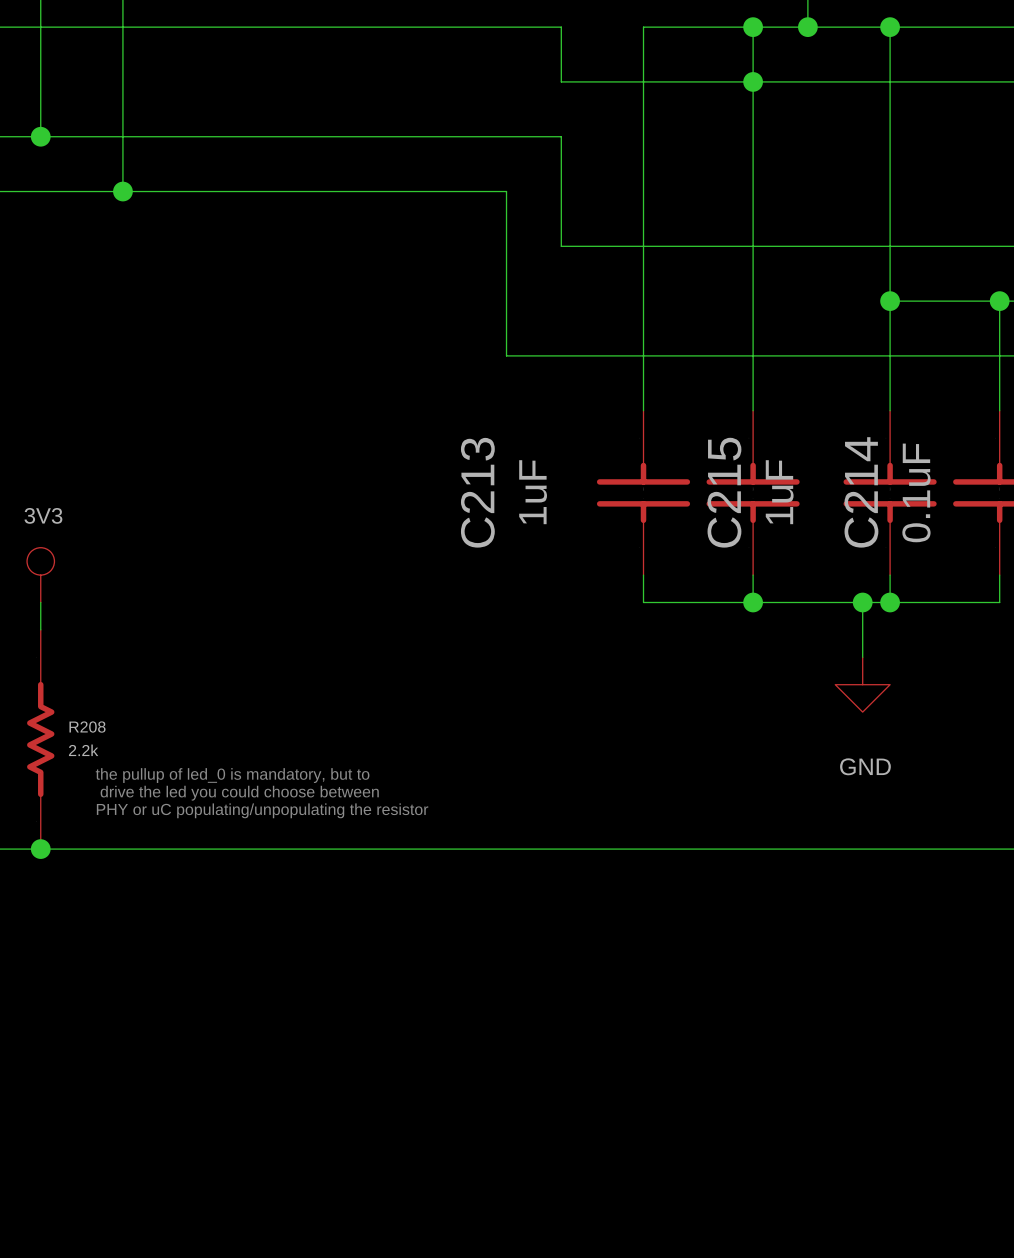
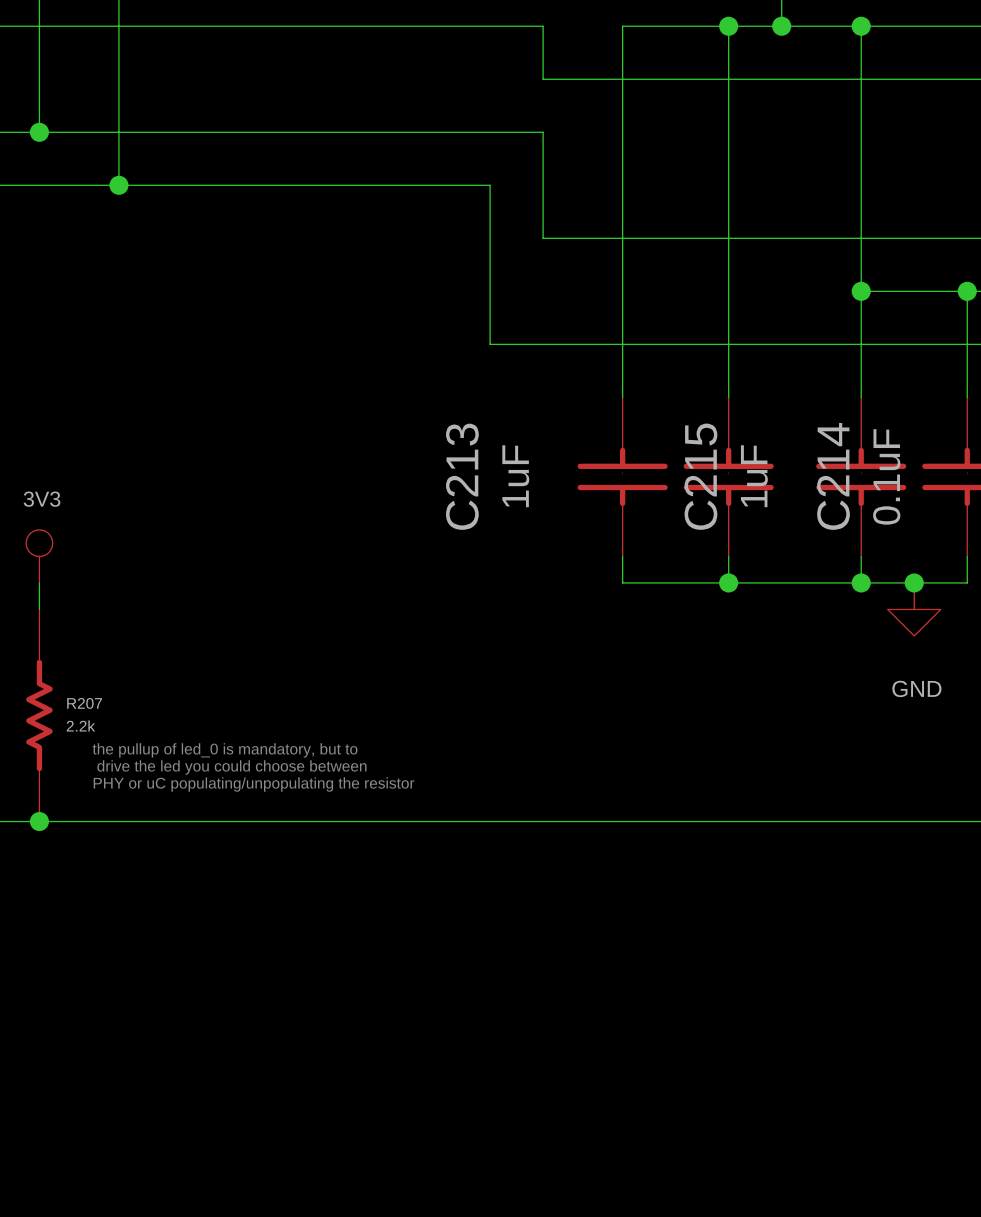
junction: (753, 81) -> none
wire: (862, 602) (862, 657) -> none
junction position: (862, 602) -> (914, 582)
power symbol position: GND (862, 684) -> GND (914, 609)
R208 name: R208 (87, 727) -> R207 (84, 703)

